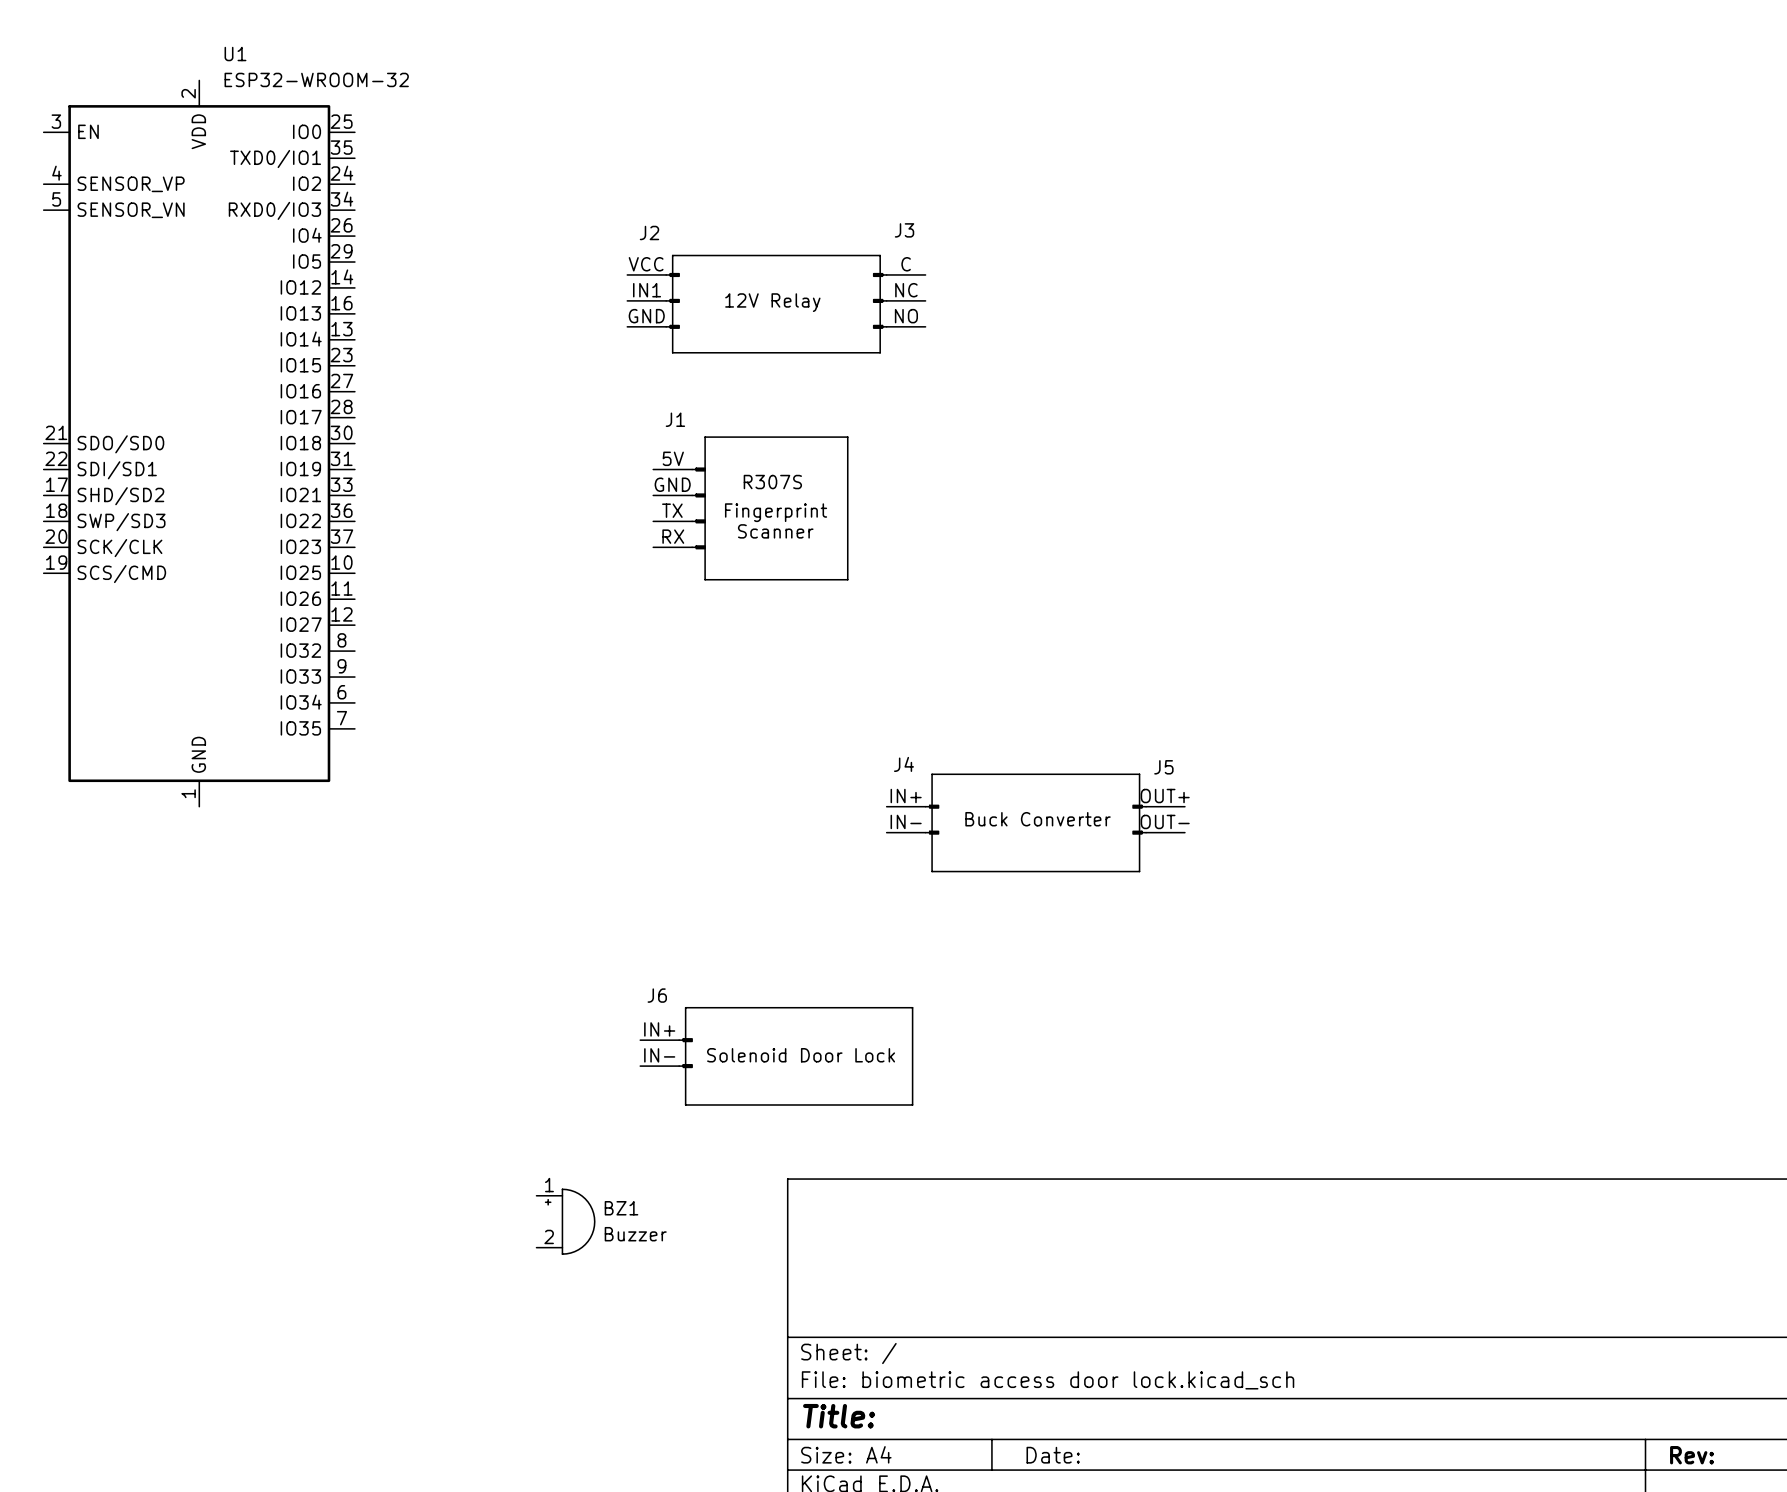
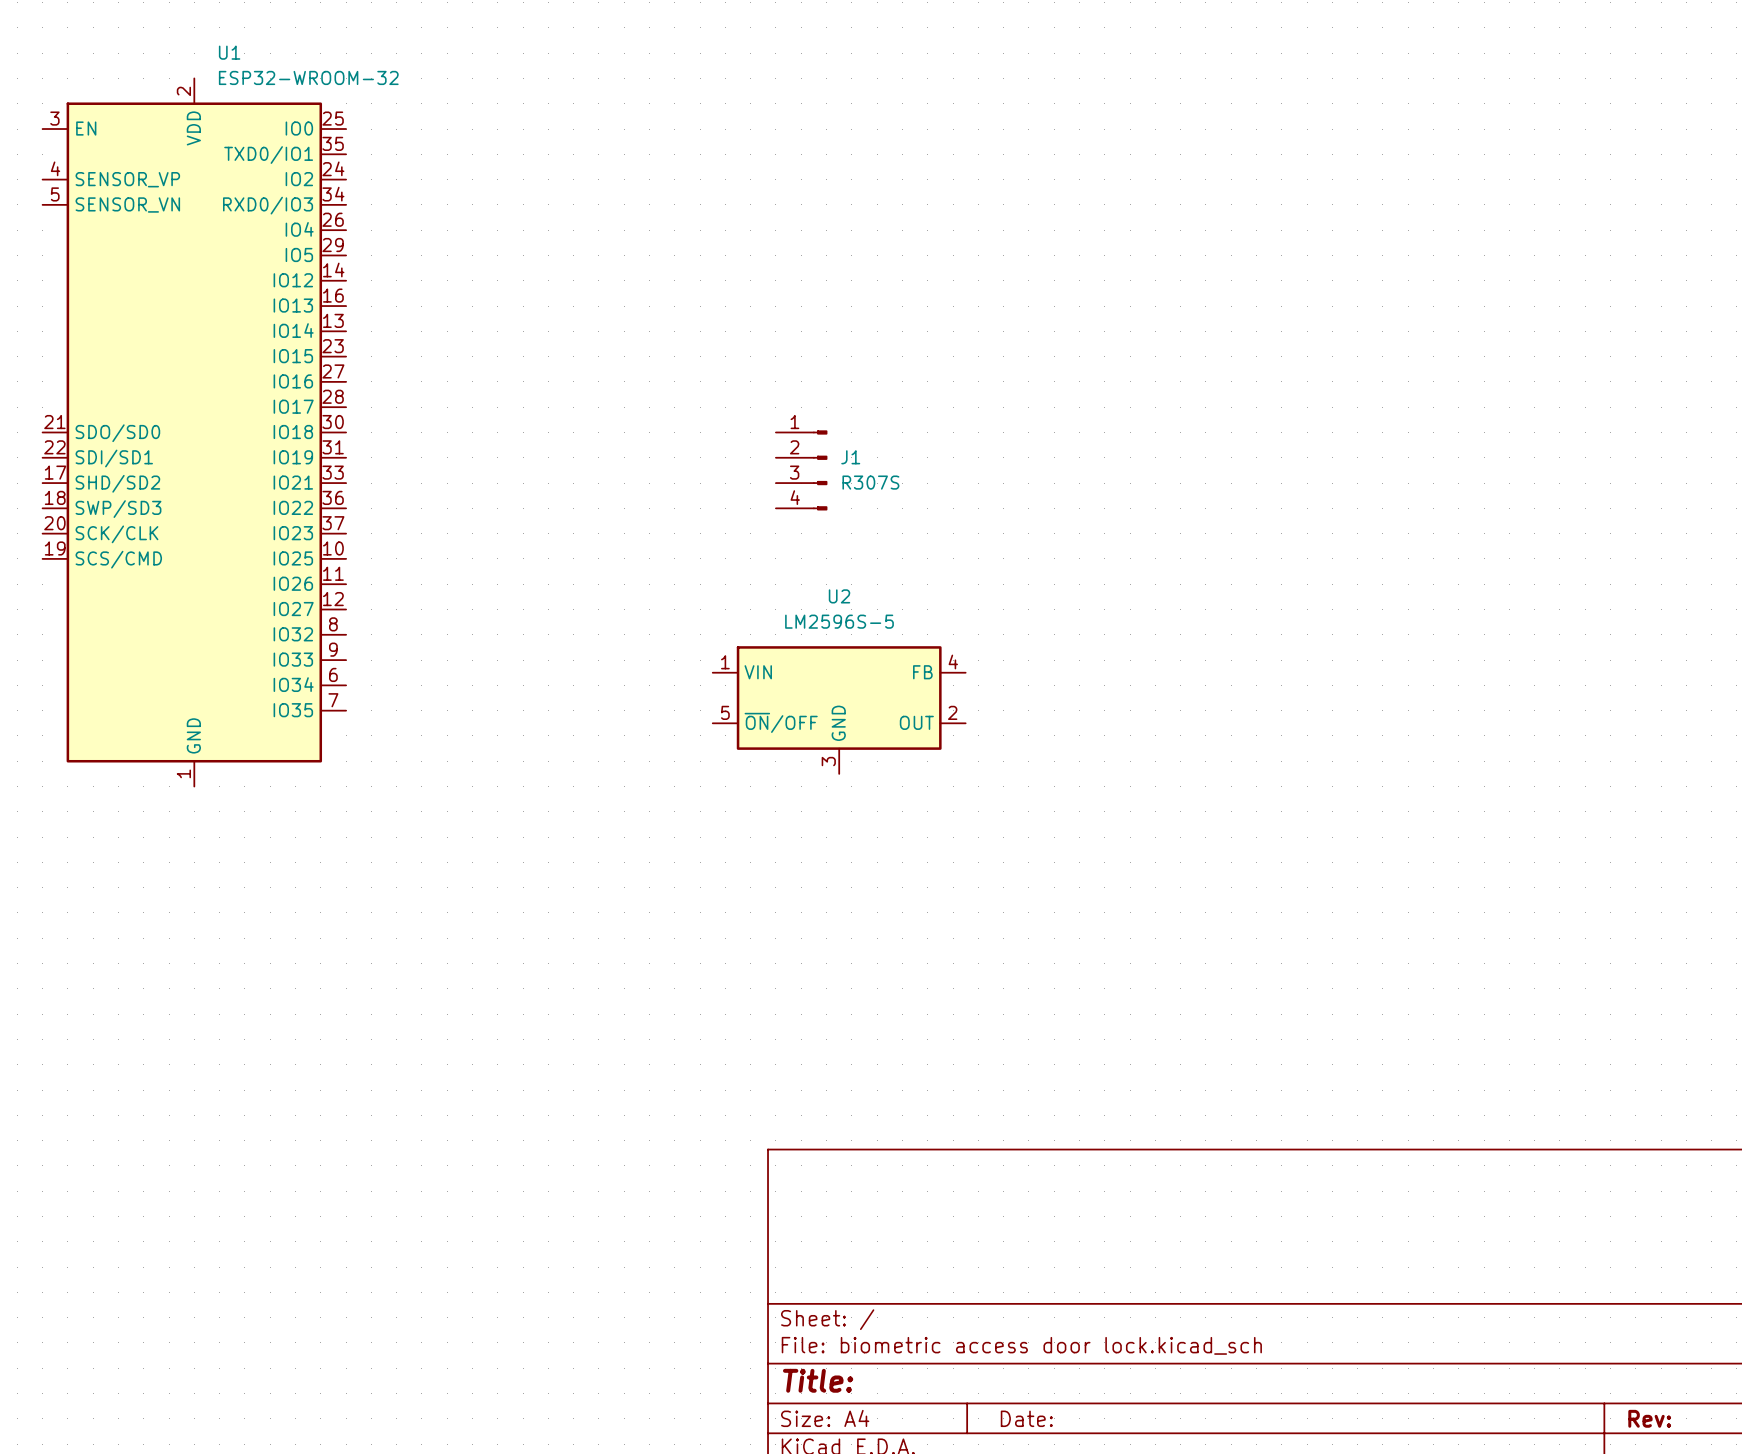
line: (672, 255) (880, 255) (880, 352) (672, 352) (672, 255) -> none
J2: (653, 300) -> none
J3: (899, 300) -> none
text: 12V Relay (772, 302) -> none
J1 name position: J1 (675, 419) -> J1 (850, 457)
line: (705, 437) (847, 437) (847, 579) (705, 579) (705, 437) -> none
J1 pin number: 5V (673, 458) -> 1 (794, 422)
text: R307S (772, 482) -> none
J1 pin number: GND (672, 484) -> 2 (794, 447)
J1 value: none -> R307S (870, 482)
J1 position: (679, 508) -> (801, 470)
J1 pin number: TX (672, 510) -> 3 (794, 472)
text: Fingerprint (776, 512) -> none
text: Scanner (775, 531) -> none
J1 pin number: RX (673, 536) -> 4 (795, 497)
U2: none -> LM2596S-5 (839, 710)
line: (932, 774) (1139, 774) (1139, 871) (932, 871) (932, 774) -> none
J4: (912, 819) -> none
text: Buck Converter (1038, 819) -> none
J5: (1158, 819) -> none
line: (685, 1007) (912, 1007) (912, 1104) (685, 1104) (685, 1007) -> none
J6: (666, 1053) -> none
text: Solenoid Door Lock (801, 1055) -> none
BZ1: Buzzer (565, 1221) -> none

